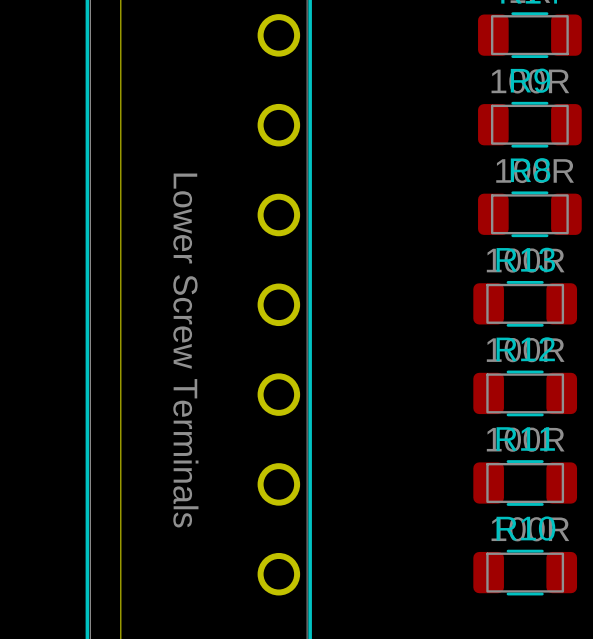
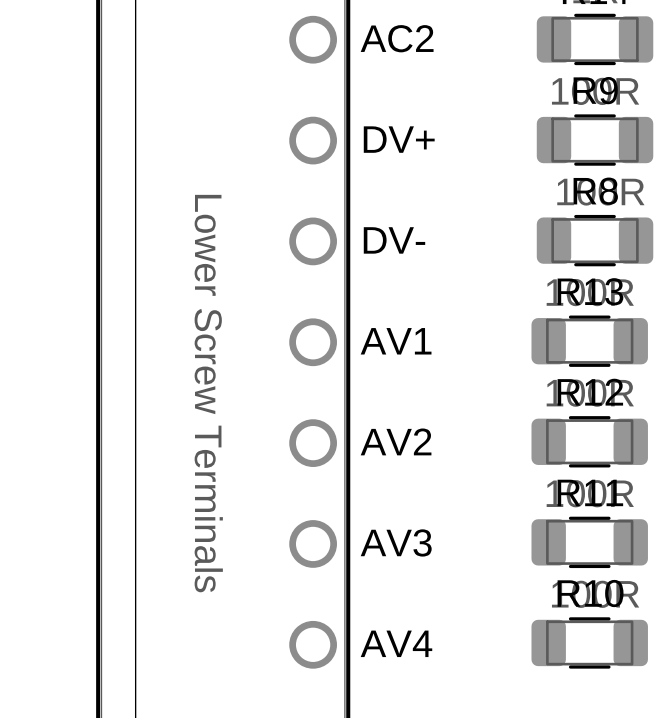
text: none -> AC2 (397, 38)
text: none -> DV+ (399, 139)
text: none -> DV- (394, 240)
text: none -> AV1 (396, 341)
text: none -> AV2 (396, 441)
text: none -> AV3 (396, 542)
text: none -> AV4 (396, 643)

